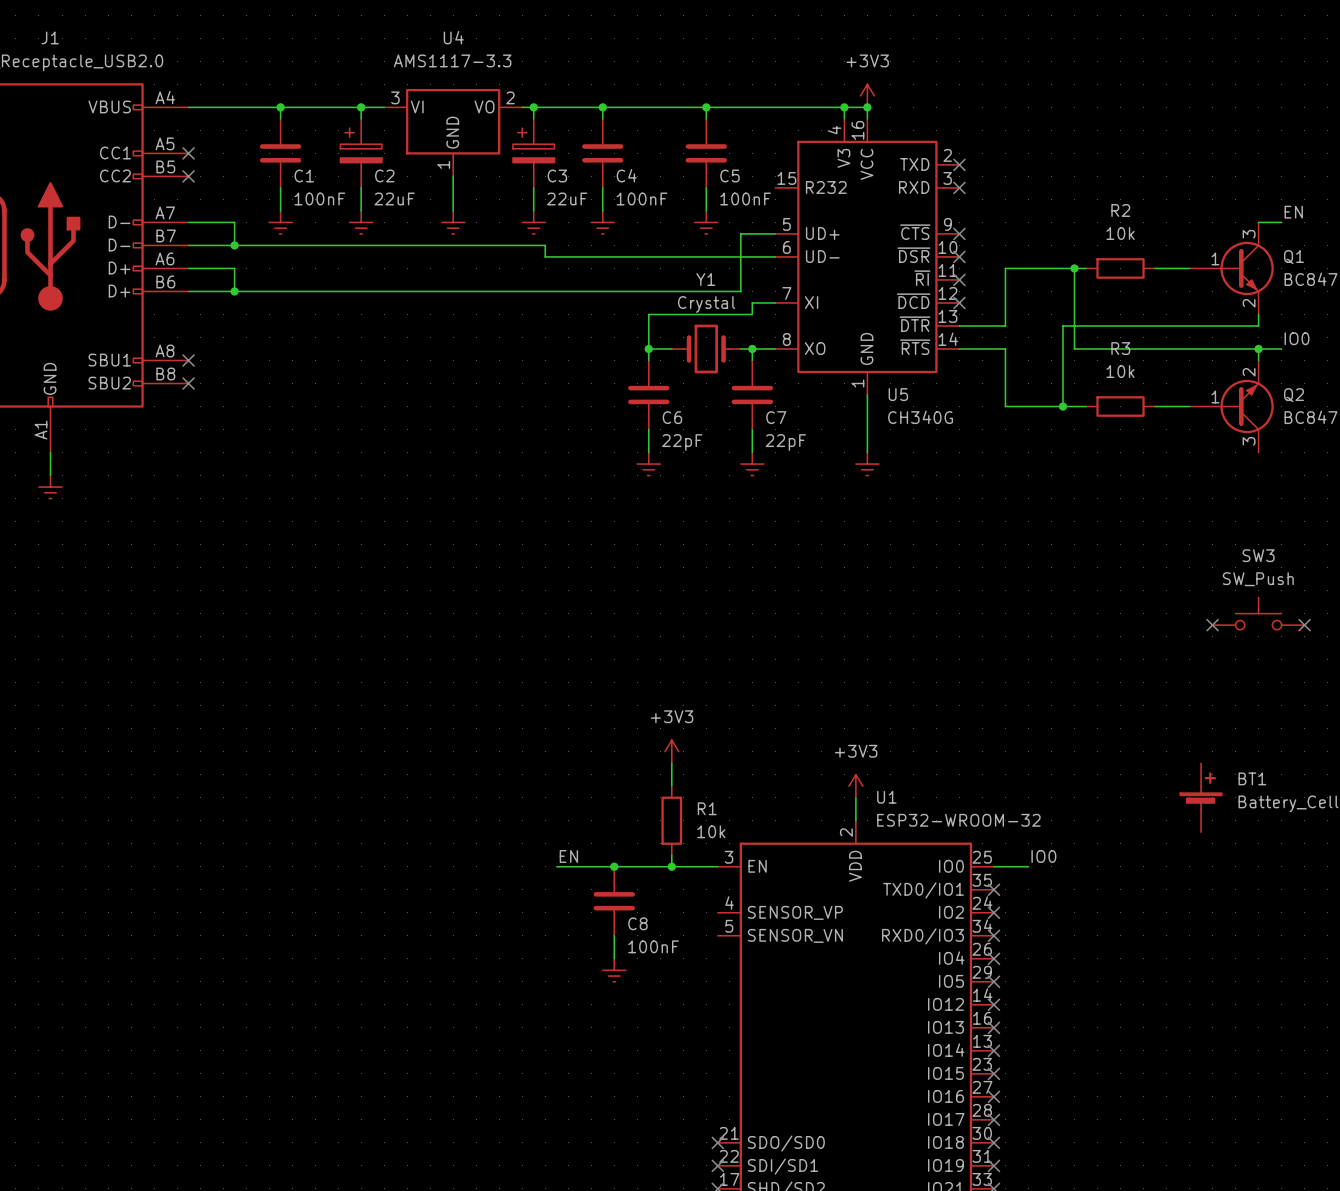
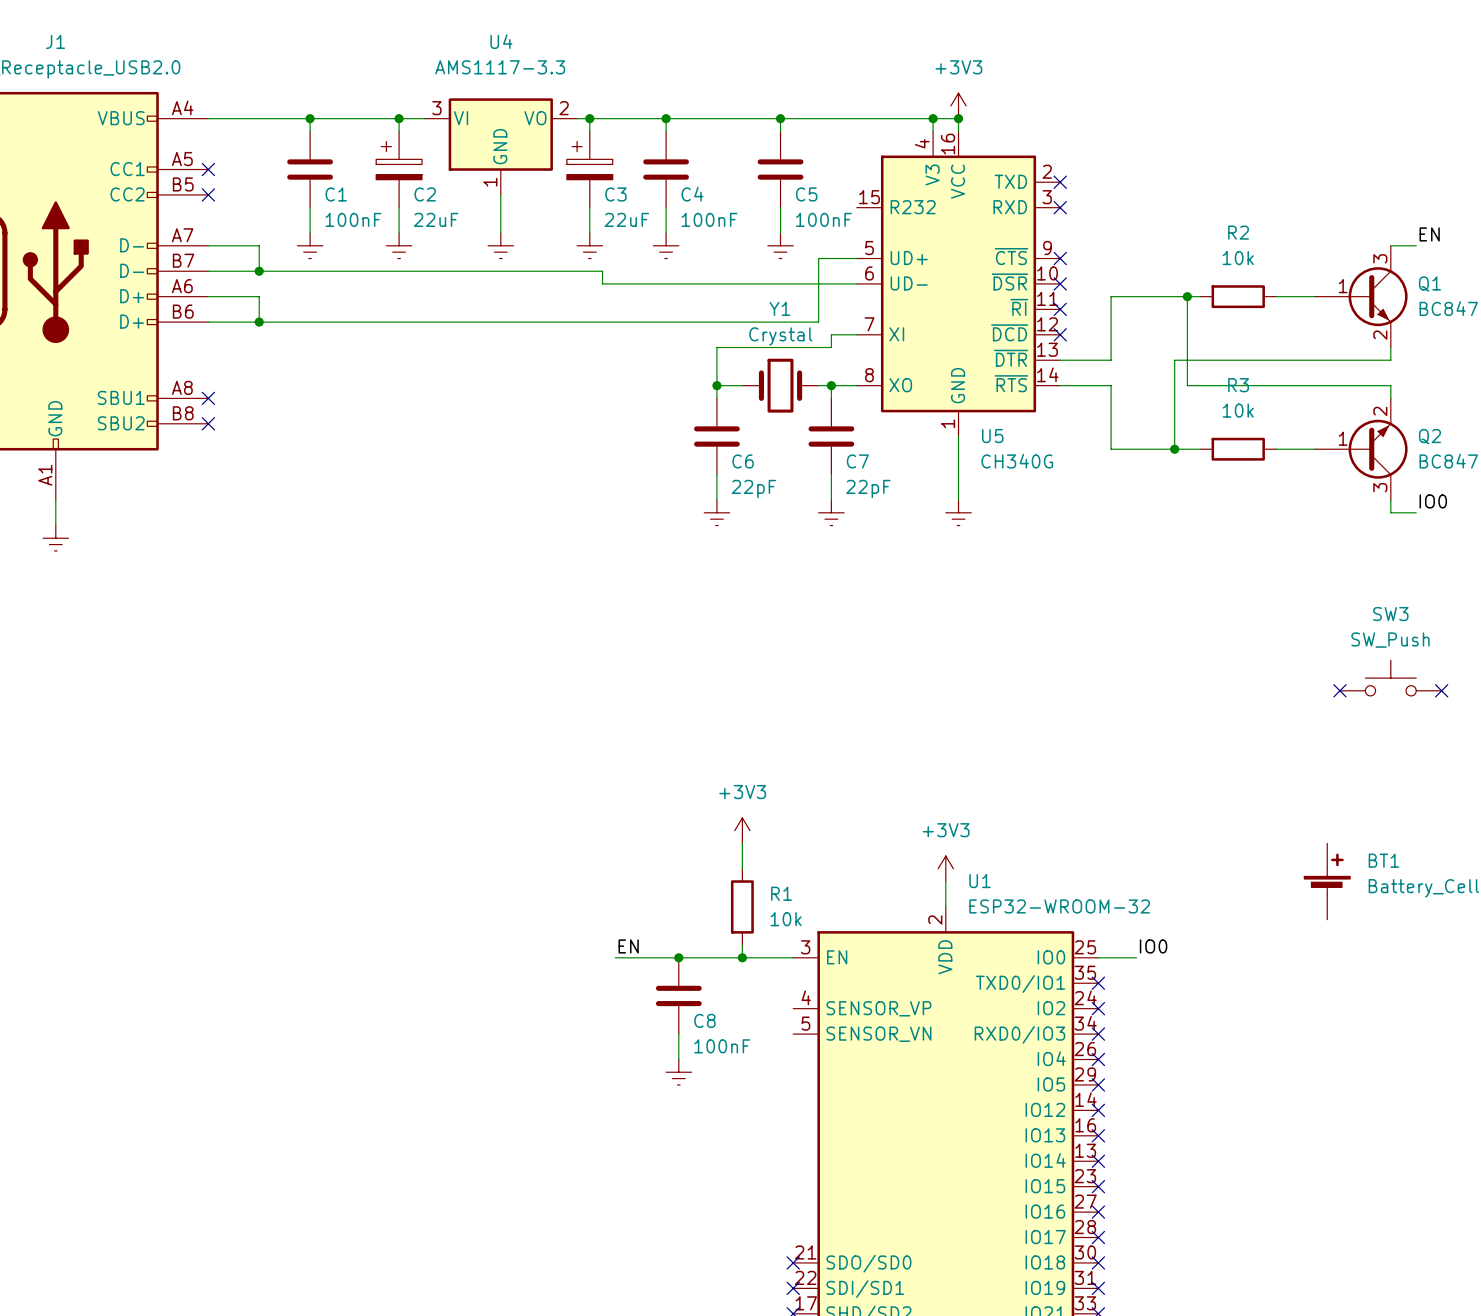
label position: IO0 (1297, 338) -> IO0 (1433, 501)
wire: (1258, 348) (1281, 348) -> none
junction: (1258, 348) -> none
wire: none -> (1390, 500) (1390, 512) (1416, 512)

